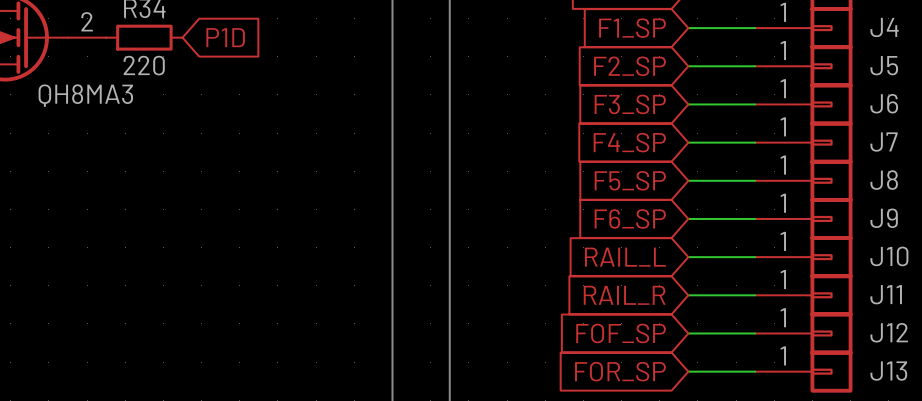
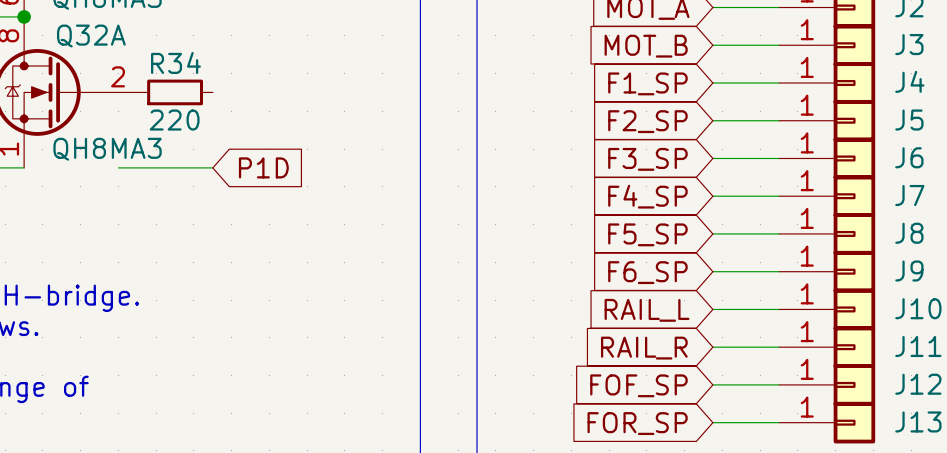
global label position: P1D (225, 37) -> P1D (263, 167)
wire: none -> (118, 167) (212, 167)

